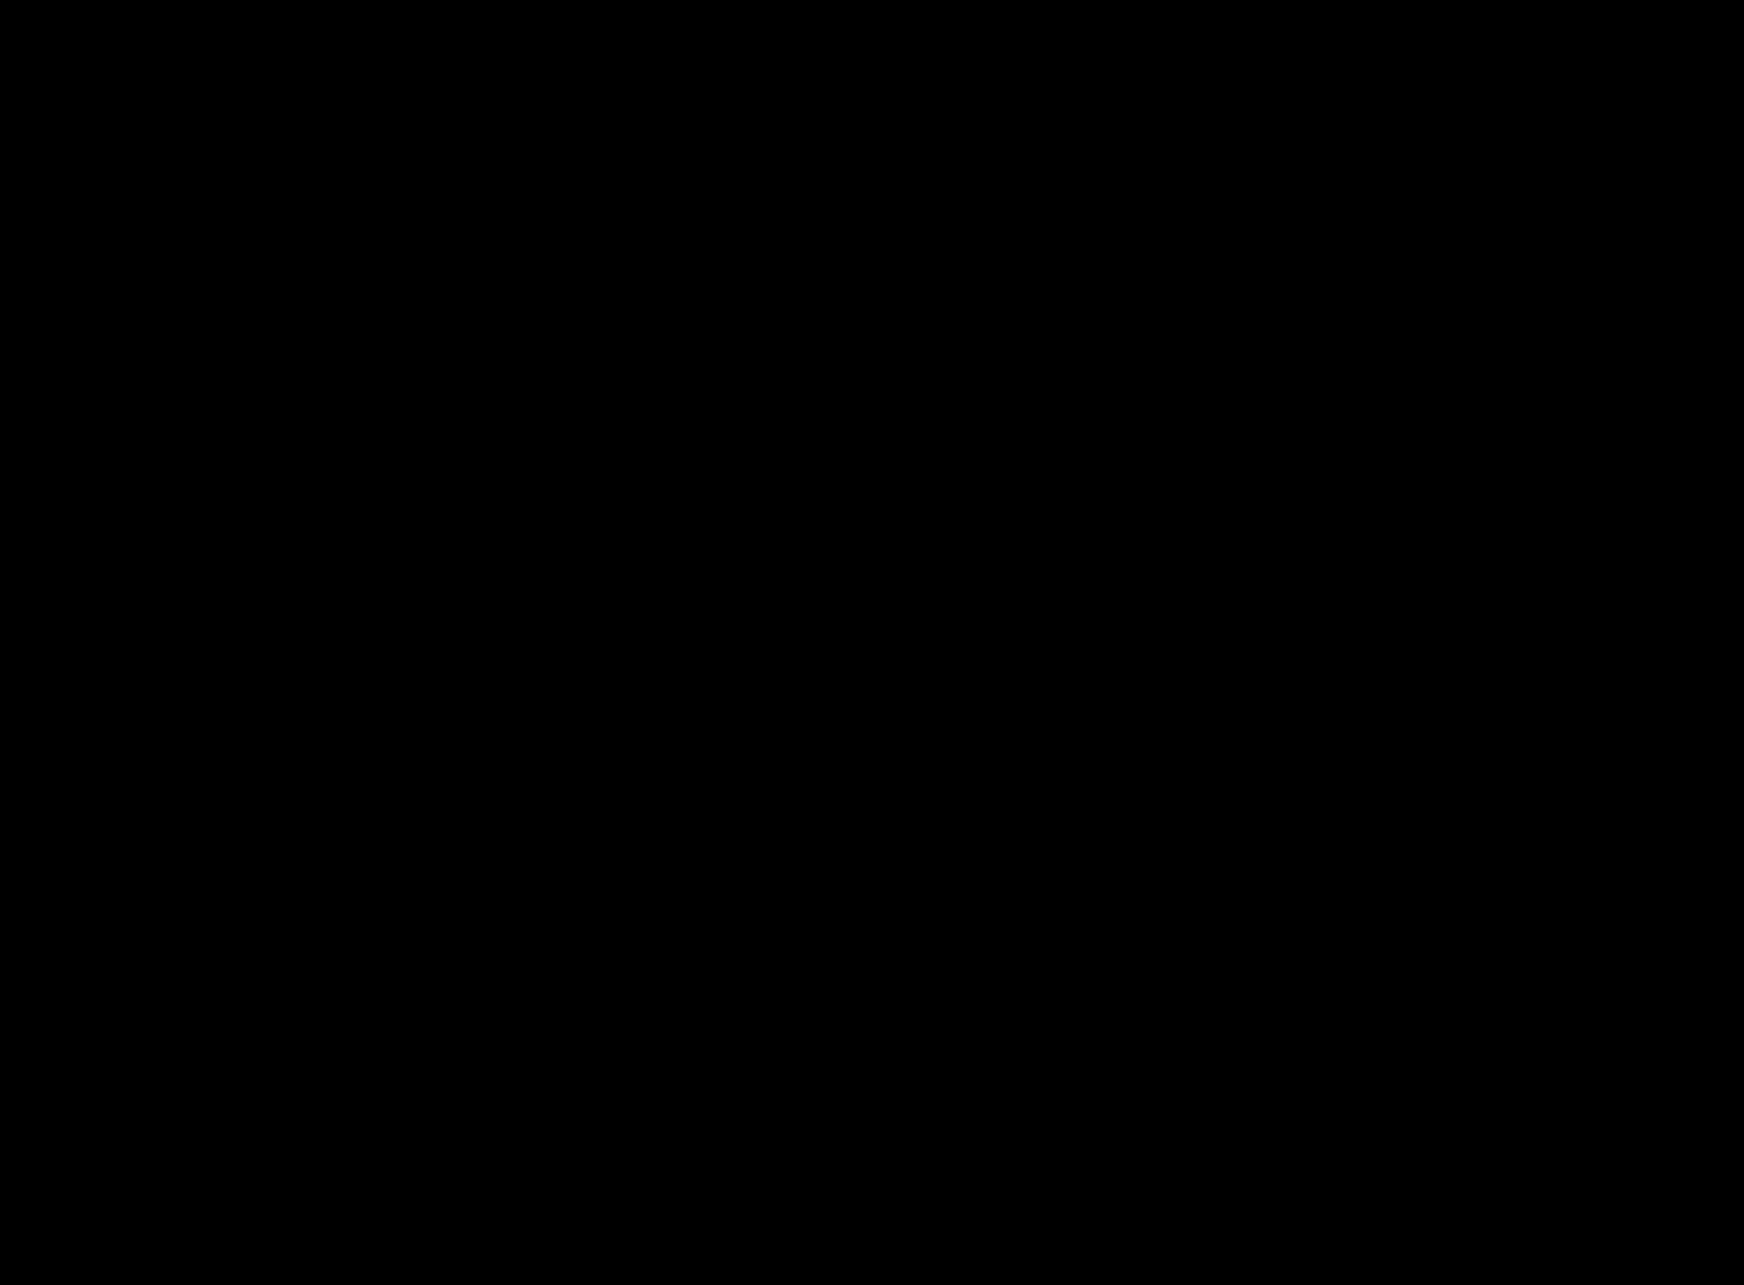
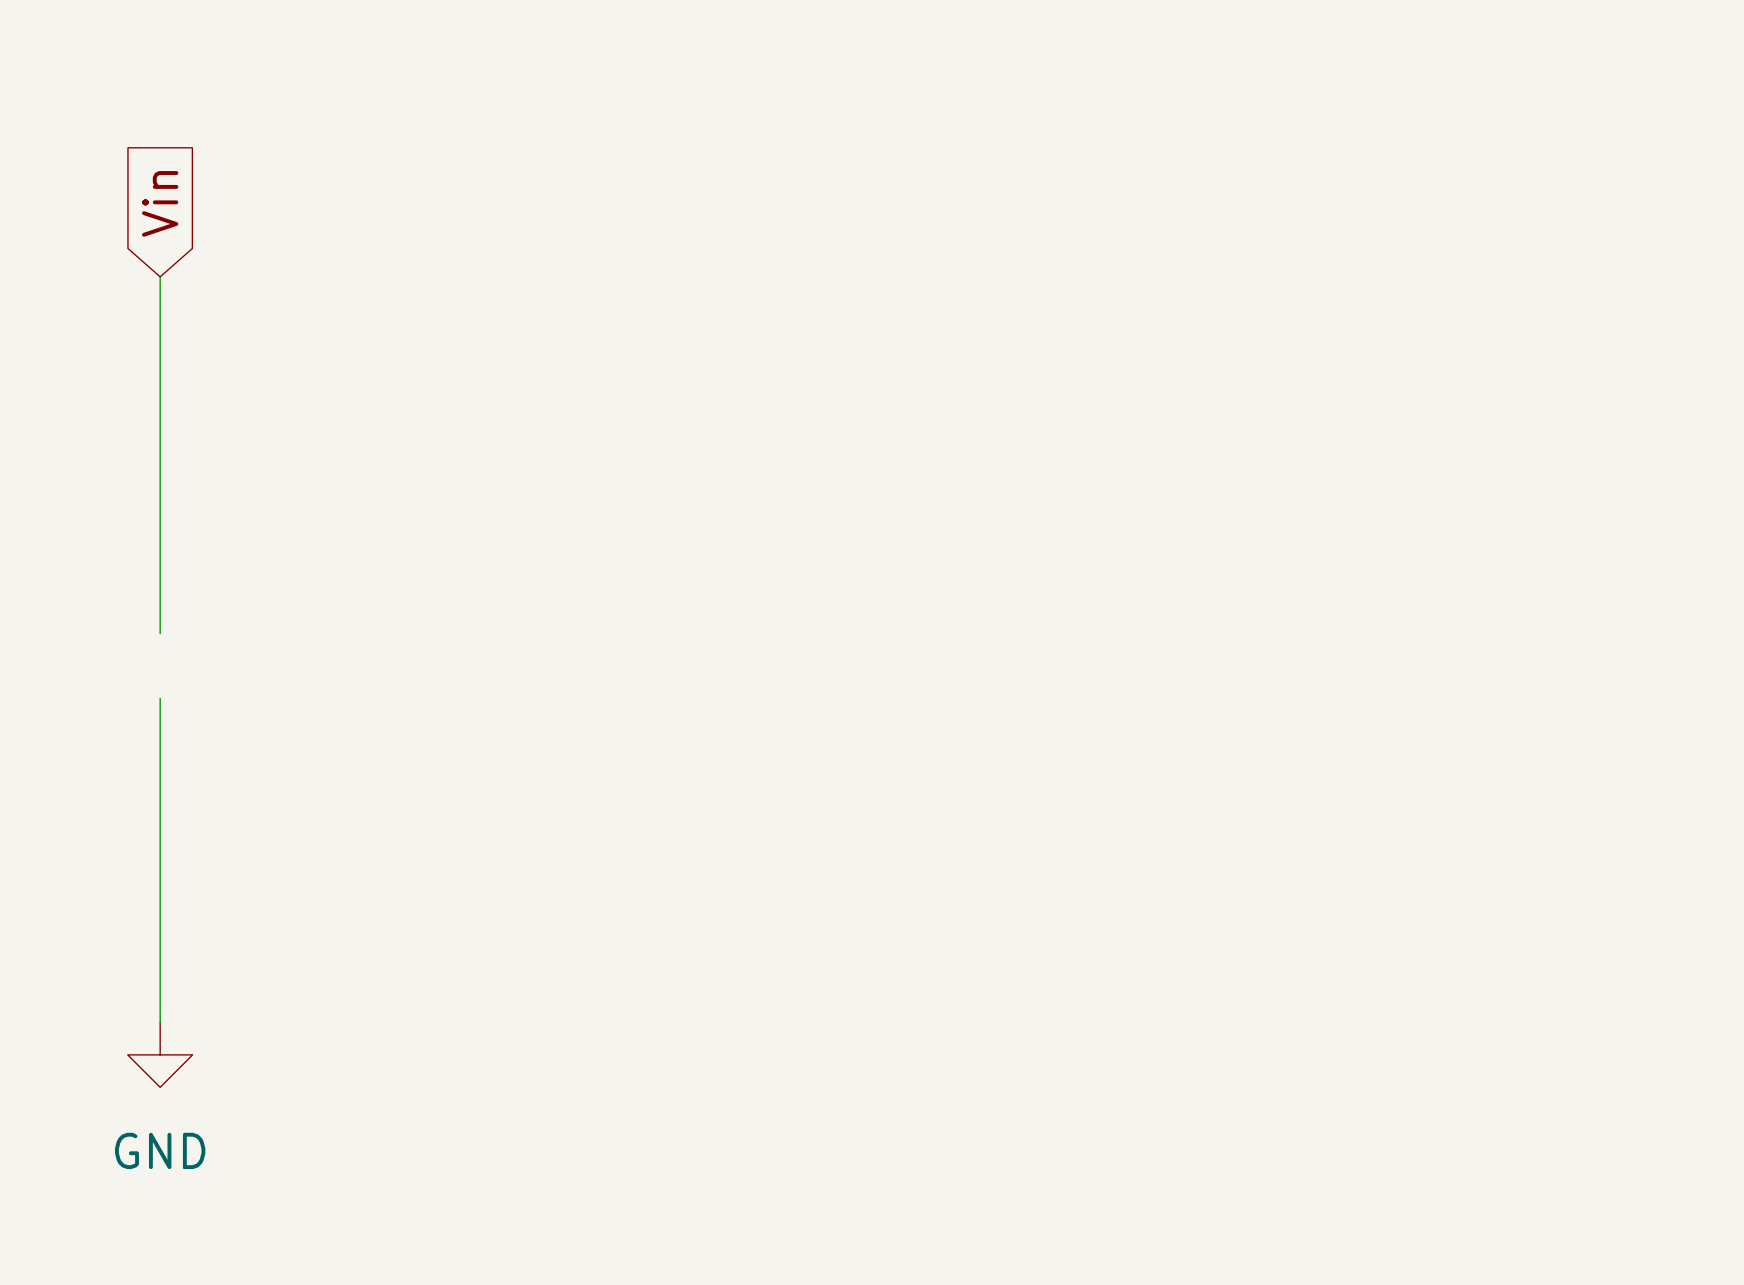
global label: none -> Vin (160, 203)
wire: none -> (160, 276) (160, 633)
wire: none -> (160, 698) (160, 1022)
power symbol: none -> GND (160, 1054)

